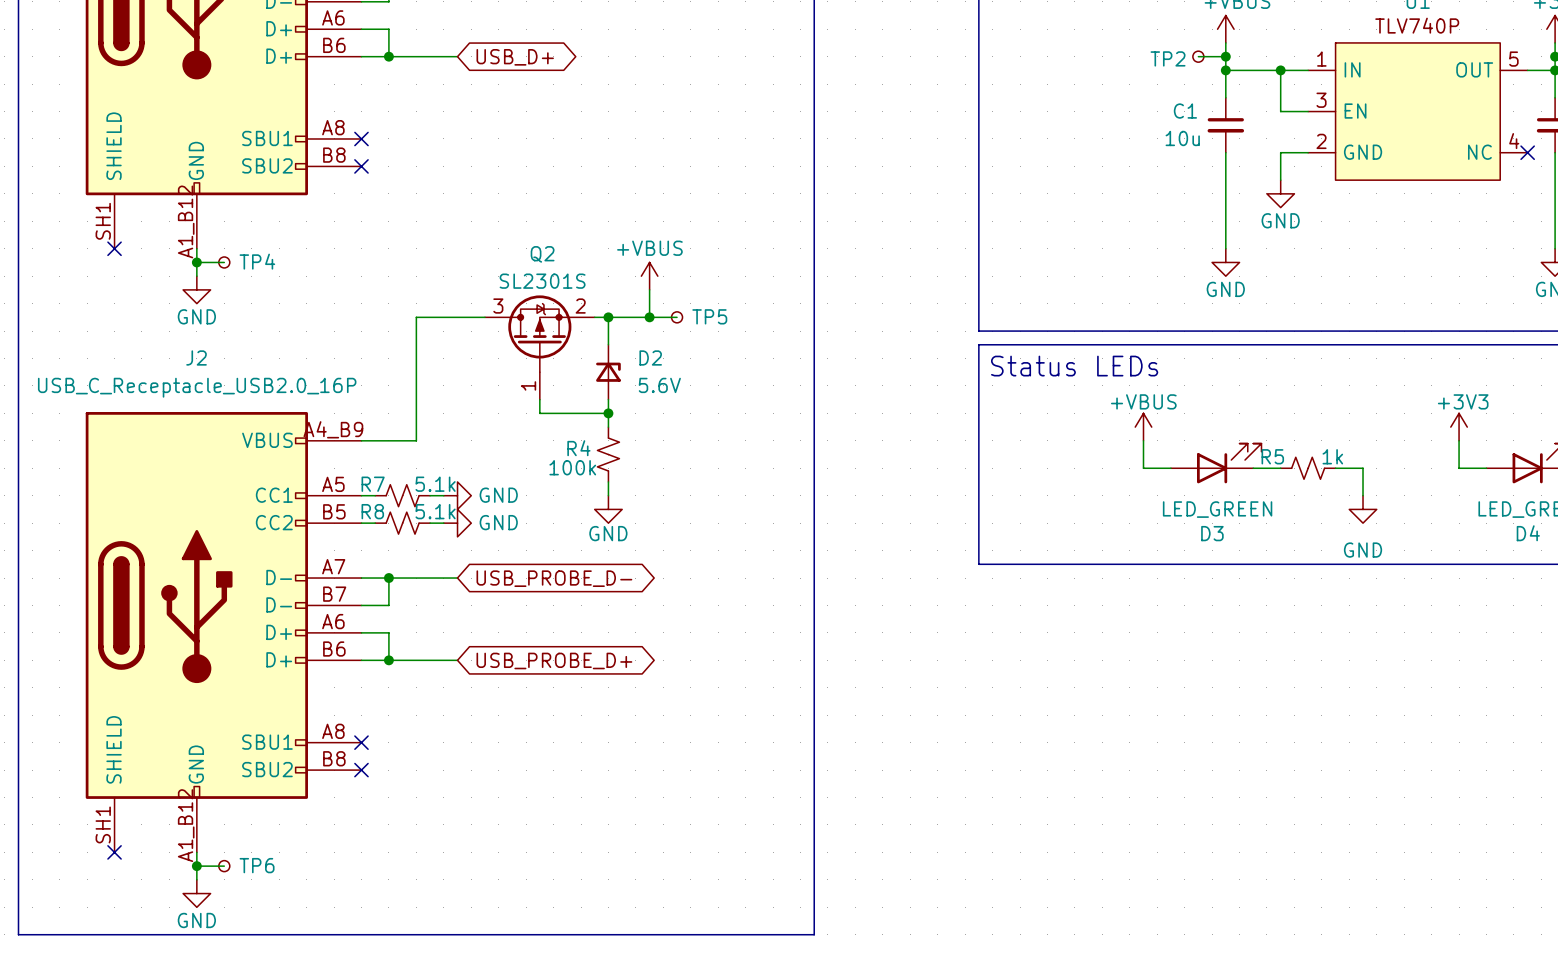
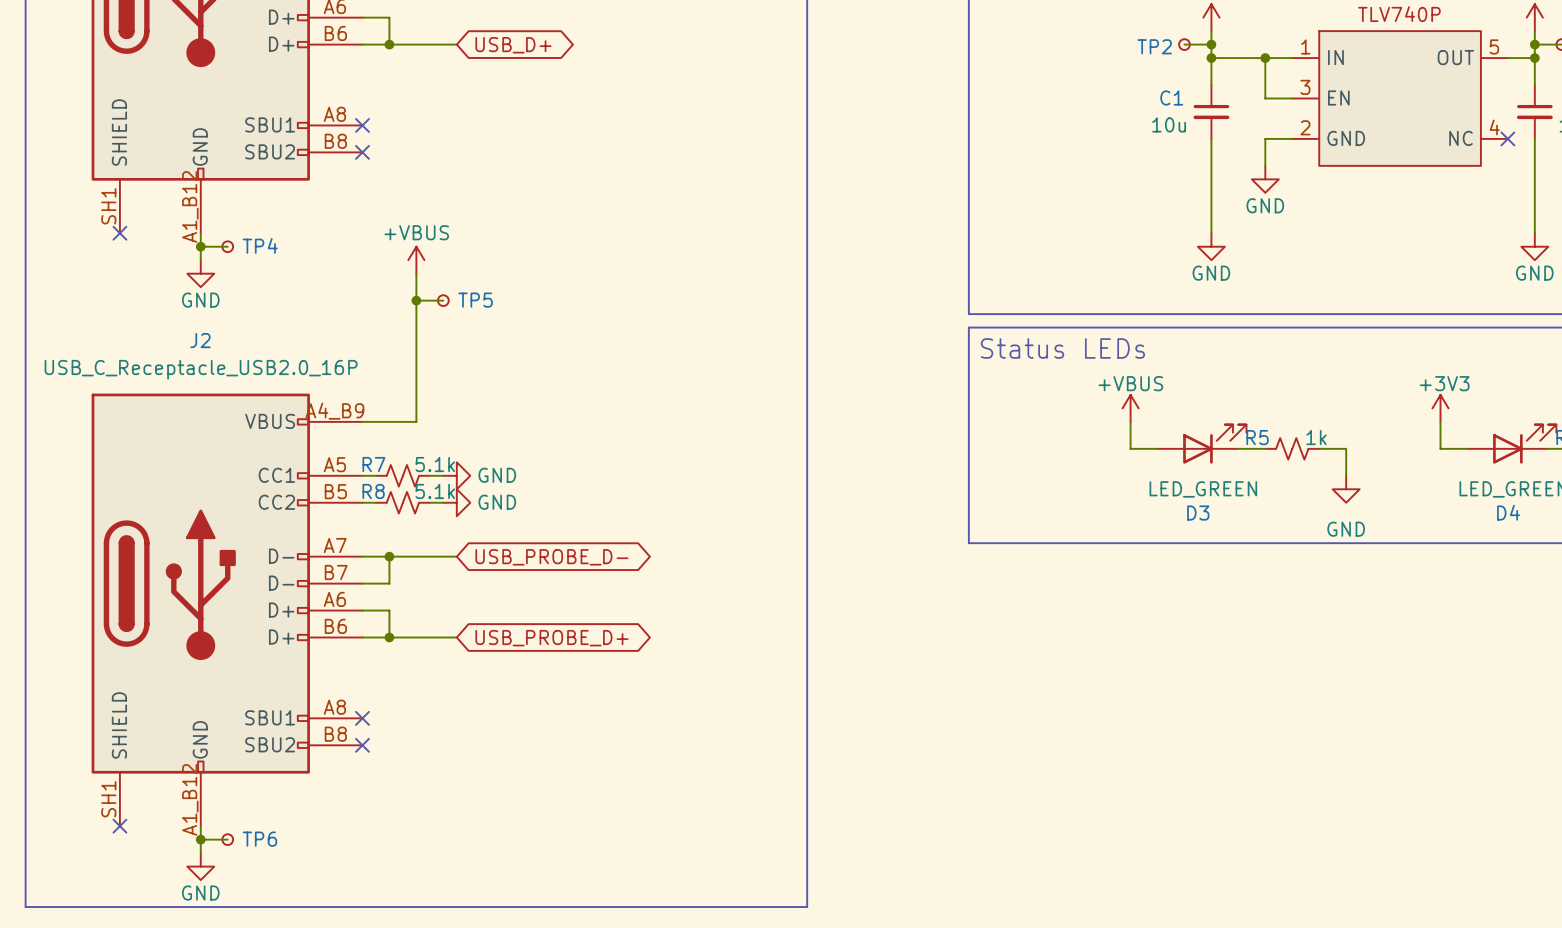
power symbol position: +VBUS (649, 276) -> +VBUS (416, 260)
wire: (649, 289) (649, 317) -> none
junction: none -> (416, 300)
wire: (443, 317) (484, 317) -> none
wire: (594, 317) (677, 317) -> none
wire: (608, 317) (608, 344) -> (416, 273) (416, 300)
junction: (608, 317) -> none
junction: (649, 317) -> none
TP5 position: (677, 317) -> (443, 300)
Q2: SL2301S (539, 347) -> none
D2: 5.6V (608, 372) -> none
wire: (539, 399) (539, 413) (608, 413) -> none
wire: (608, 399) (608, 427) -> none
junction: (608, 413) -> none
R4: 100k (608, 454) -> none
wire: (608, 481) (608, 495) -> none
power symbol: GND (608, 509) -> none

